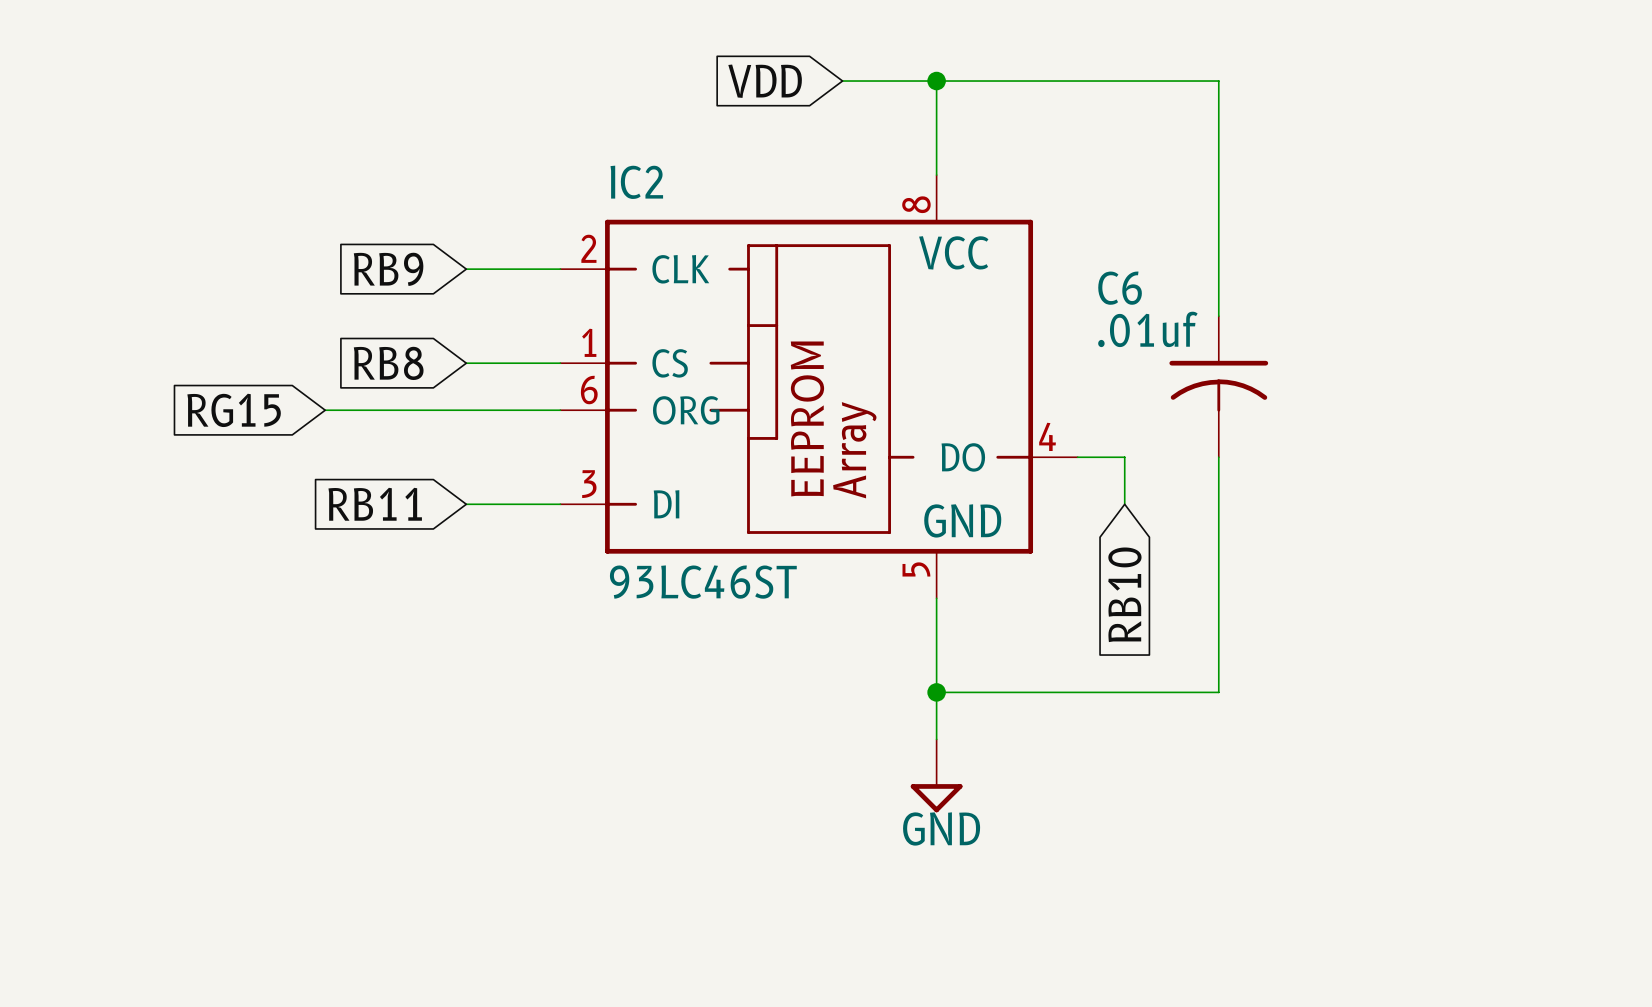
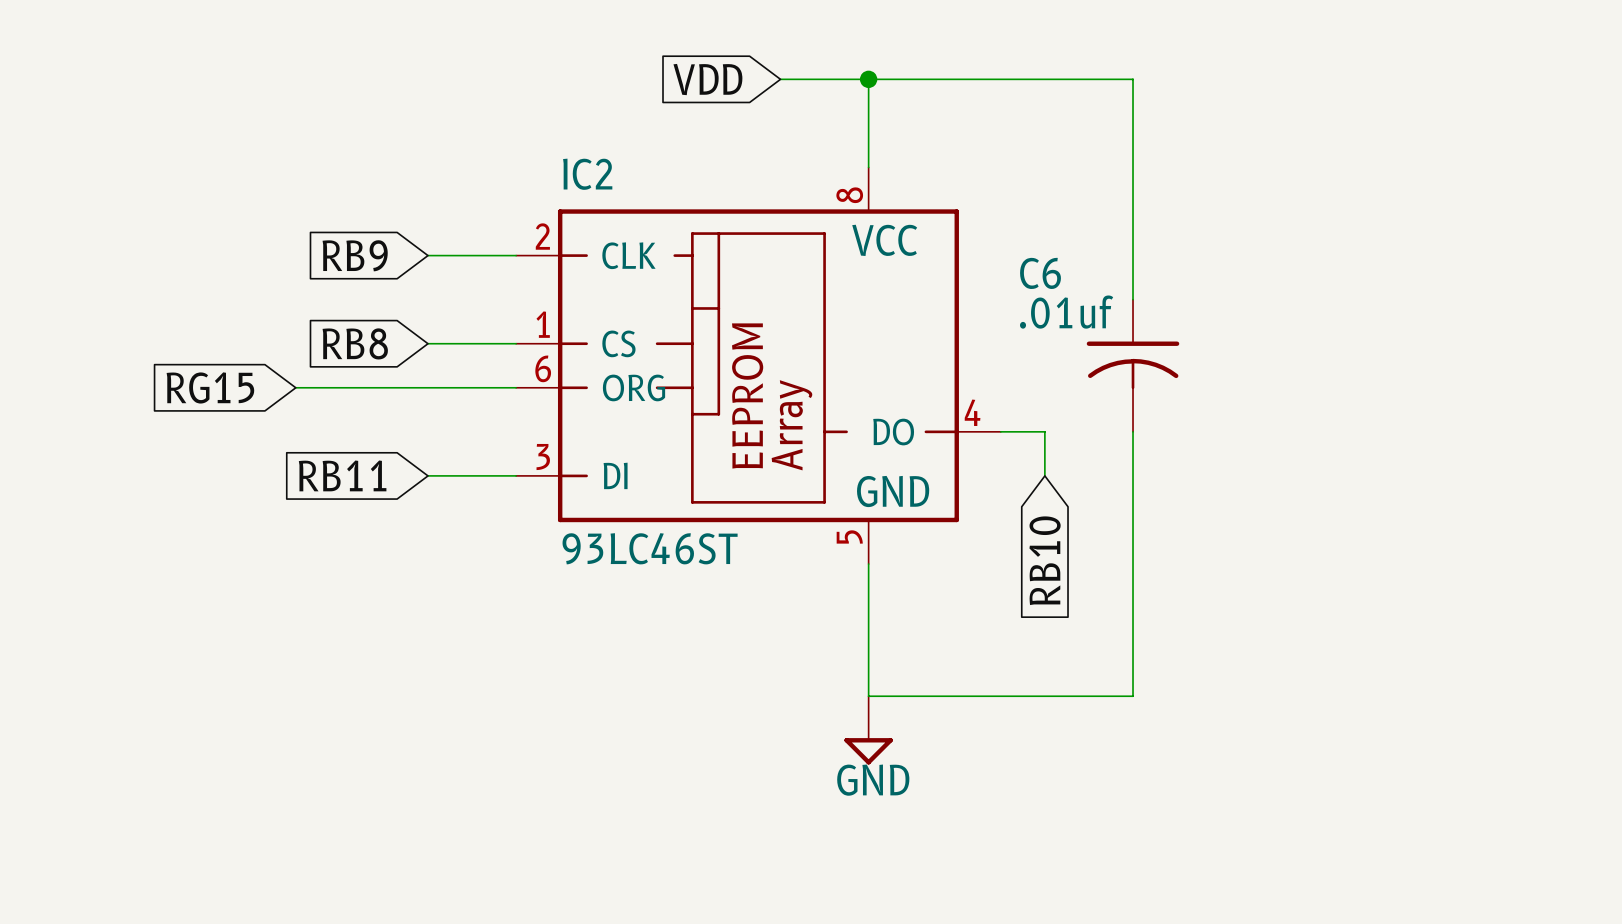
wire: (936, 692) (1218, 692) -> (868, 696) (1133, 696) (1133, 652)
junction: (936, 692) -> none

